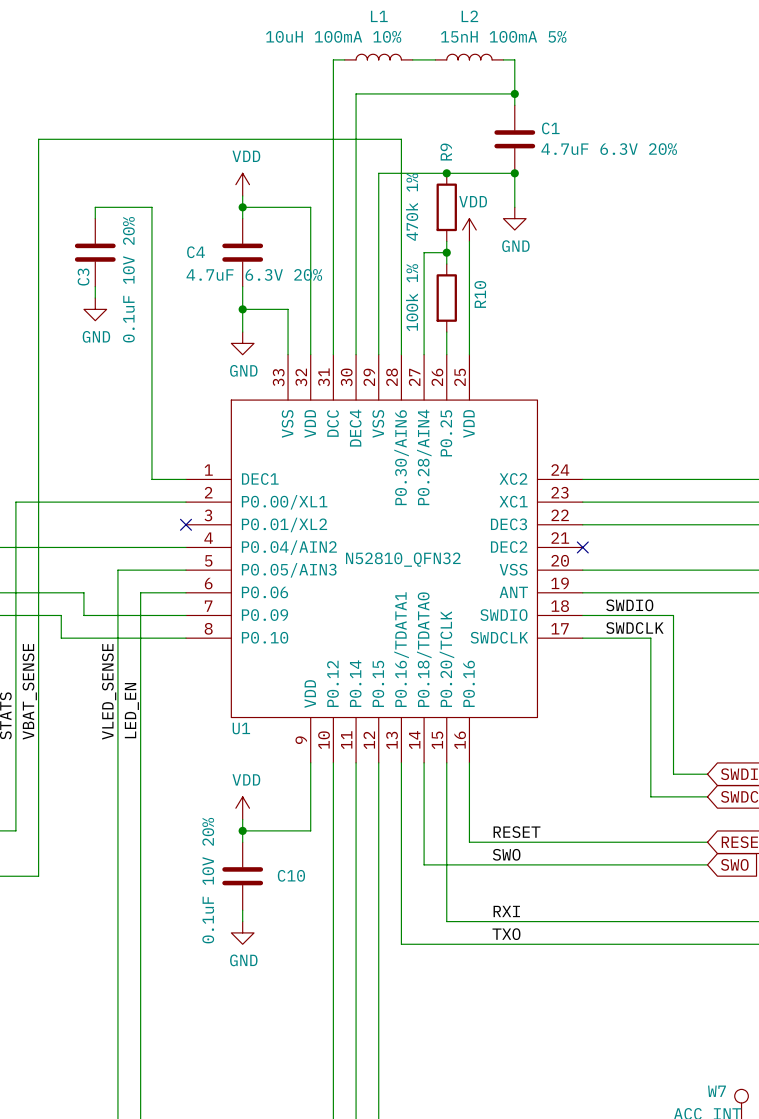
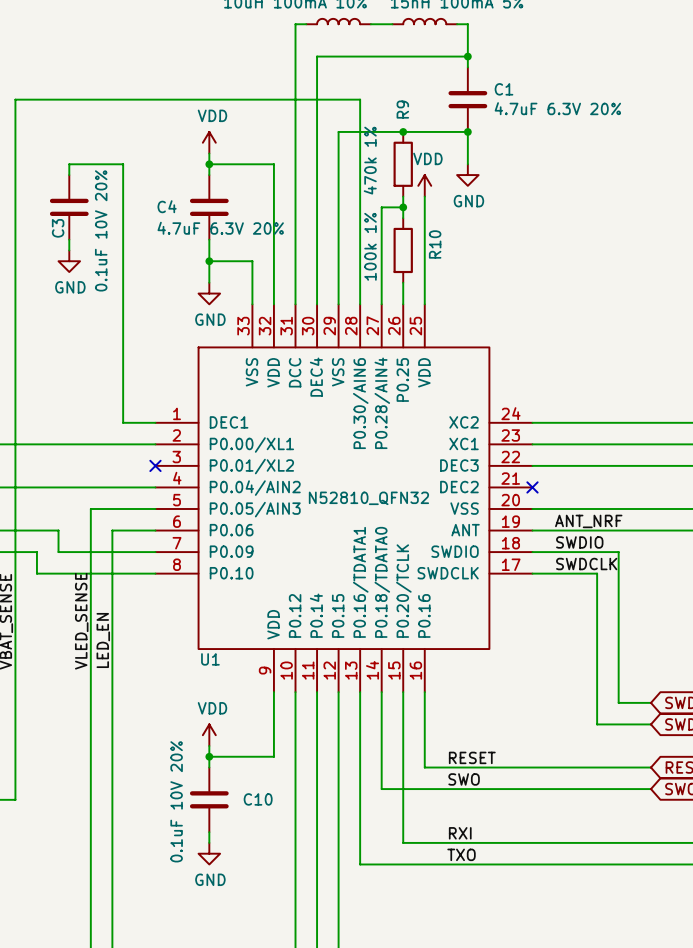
label: none -> ANT_NRF (588, 521)

